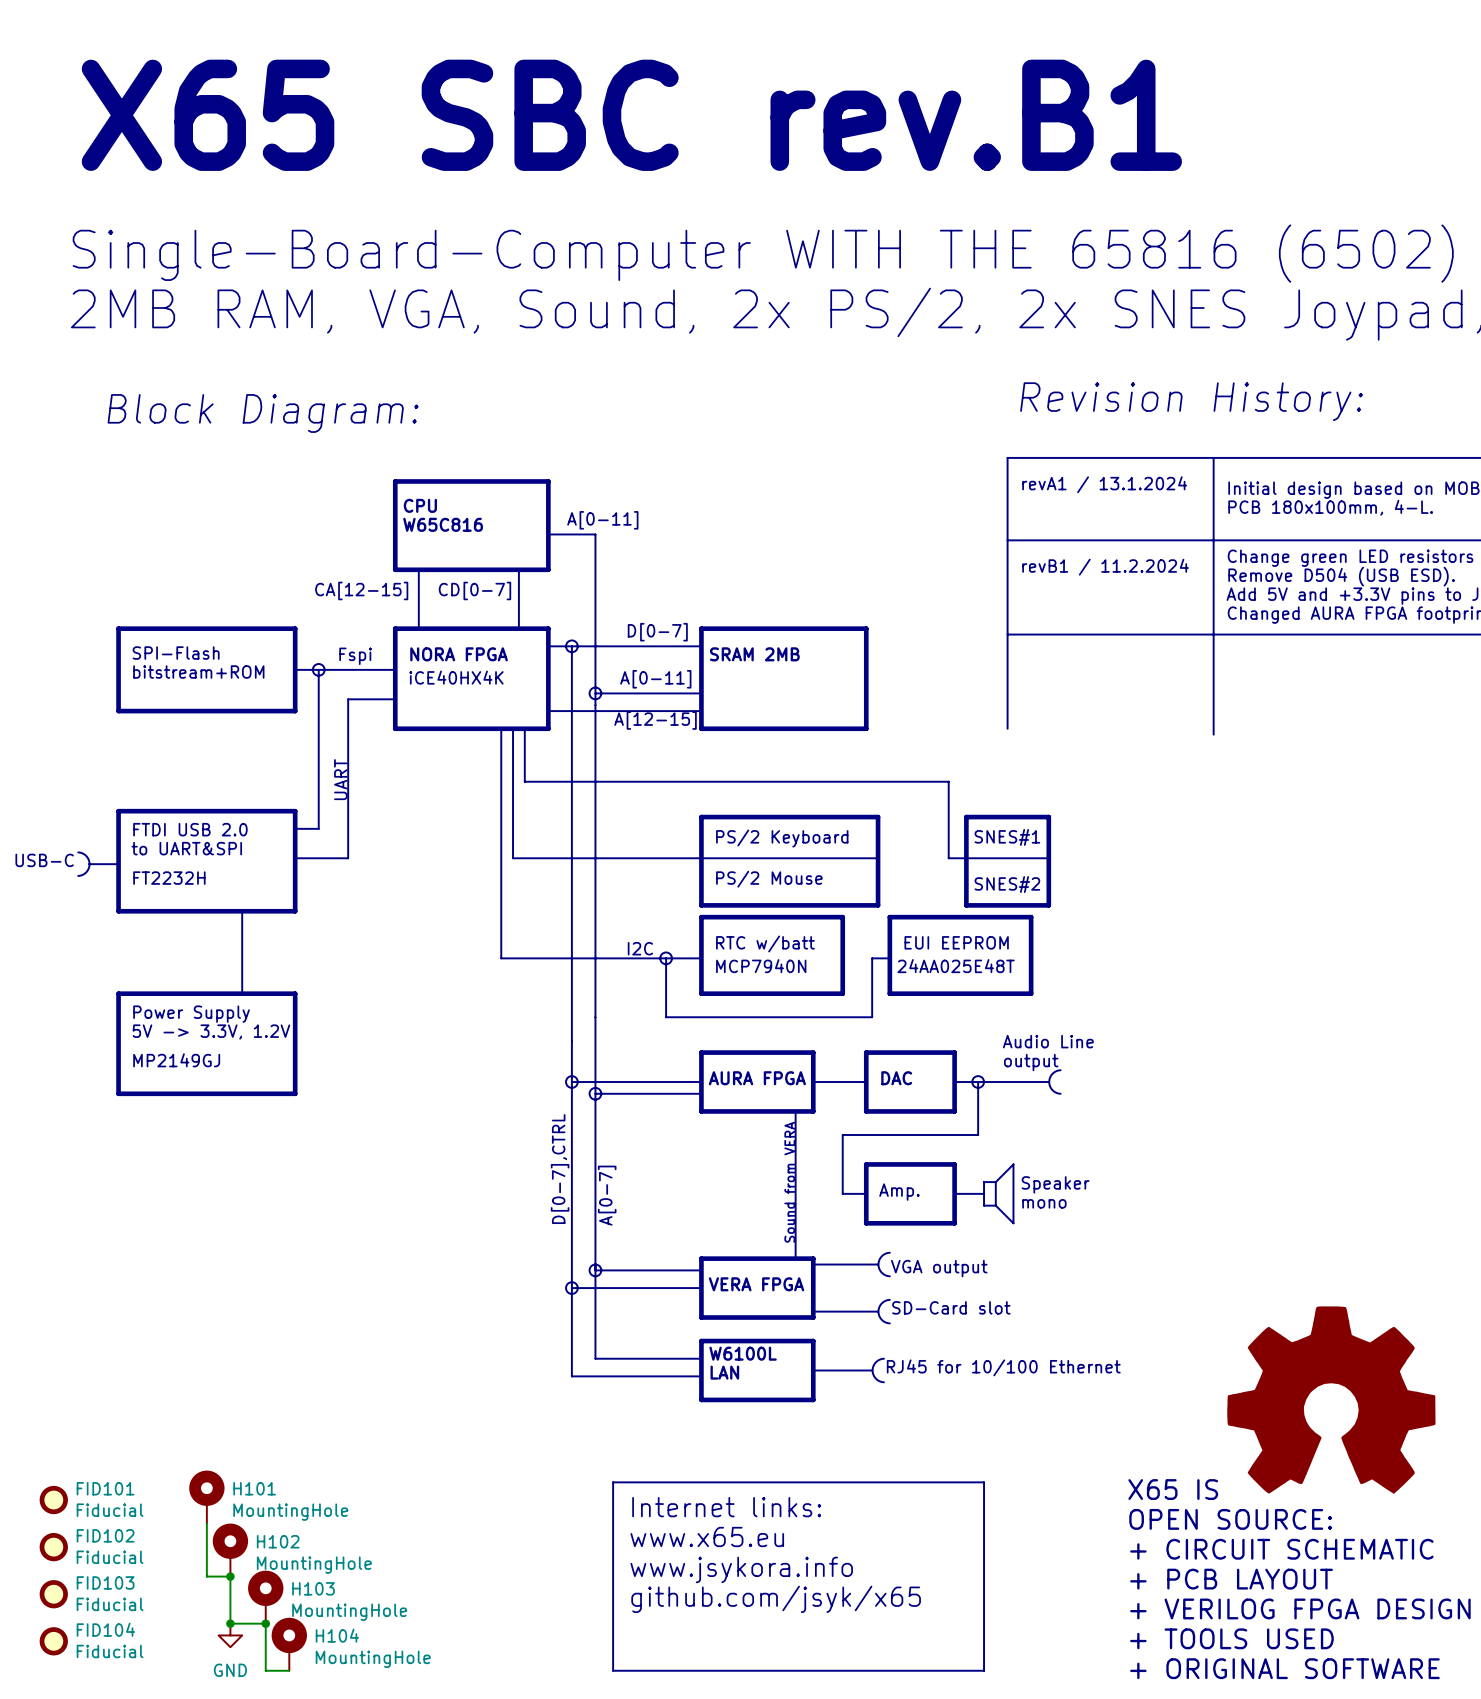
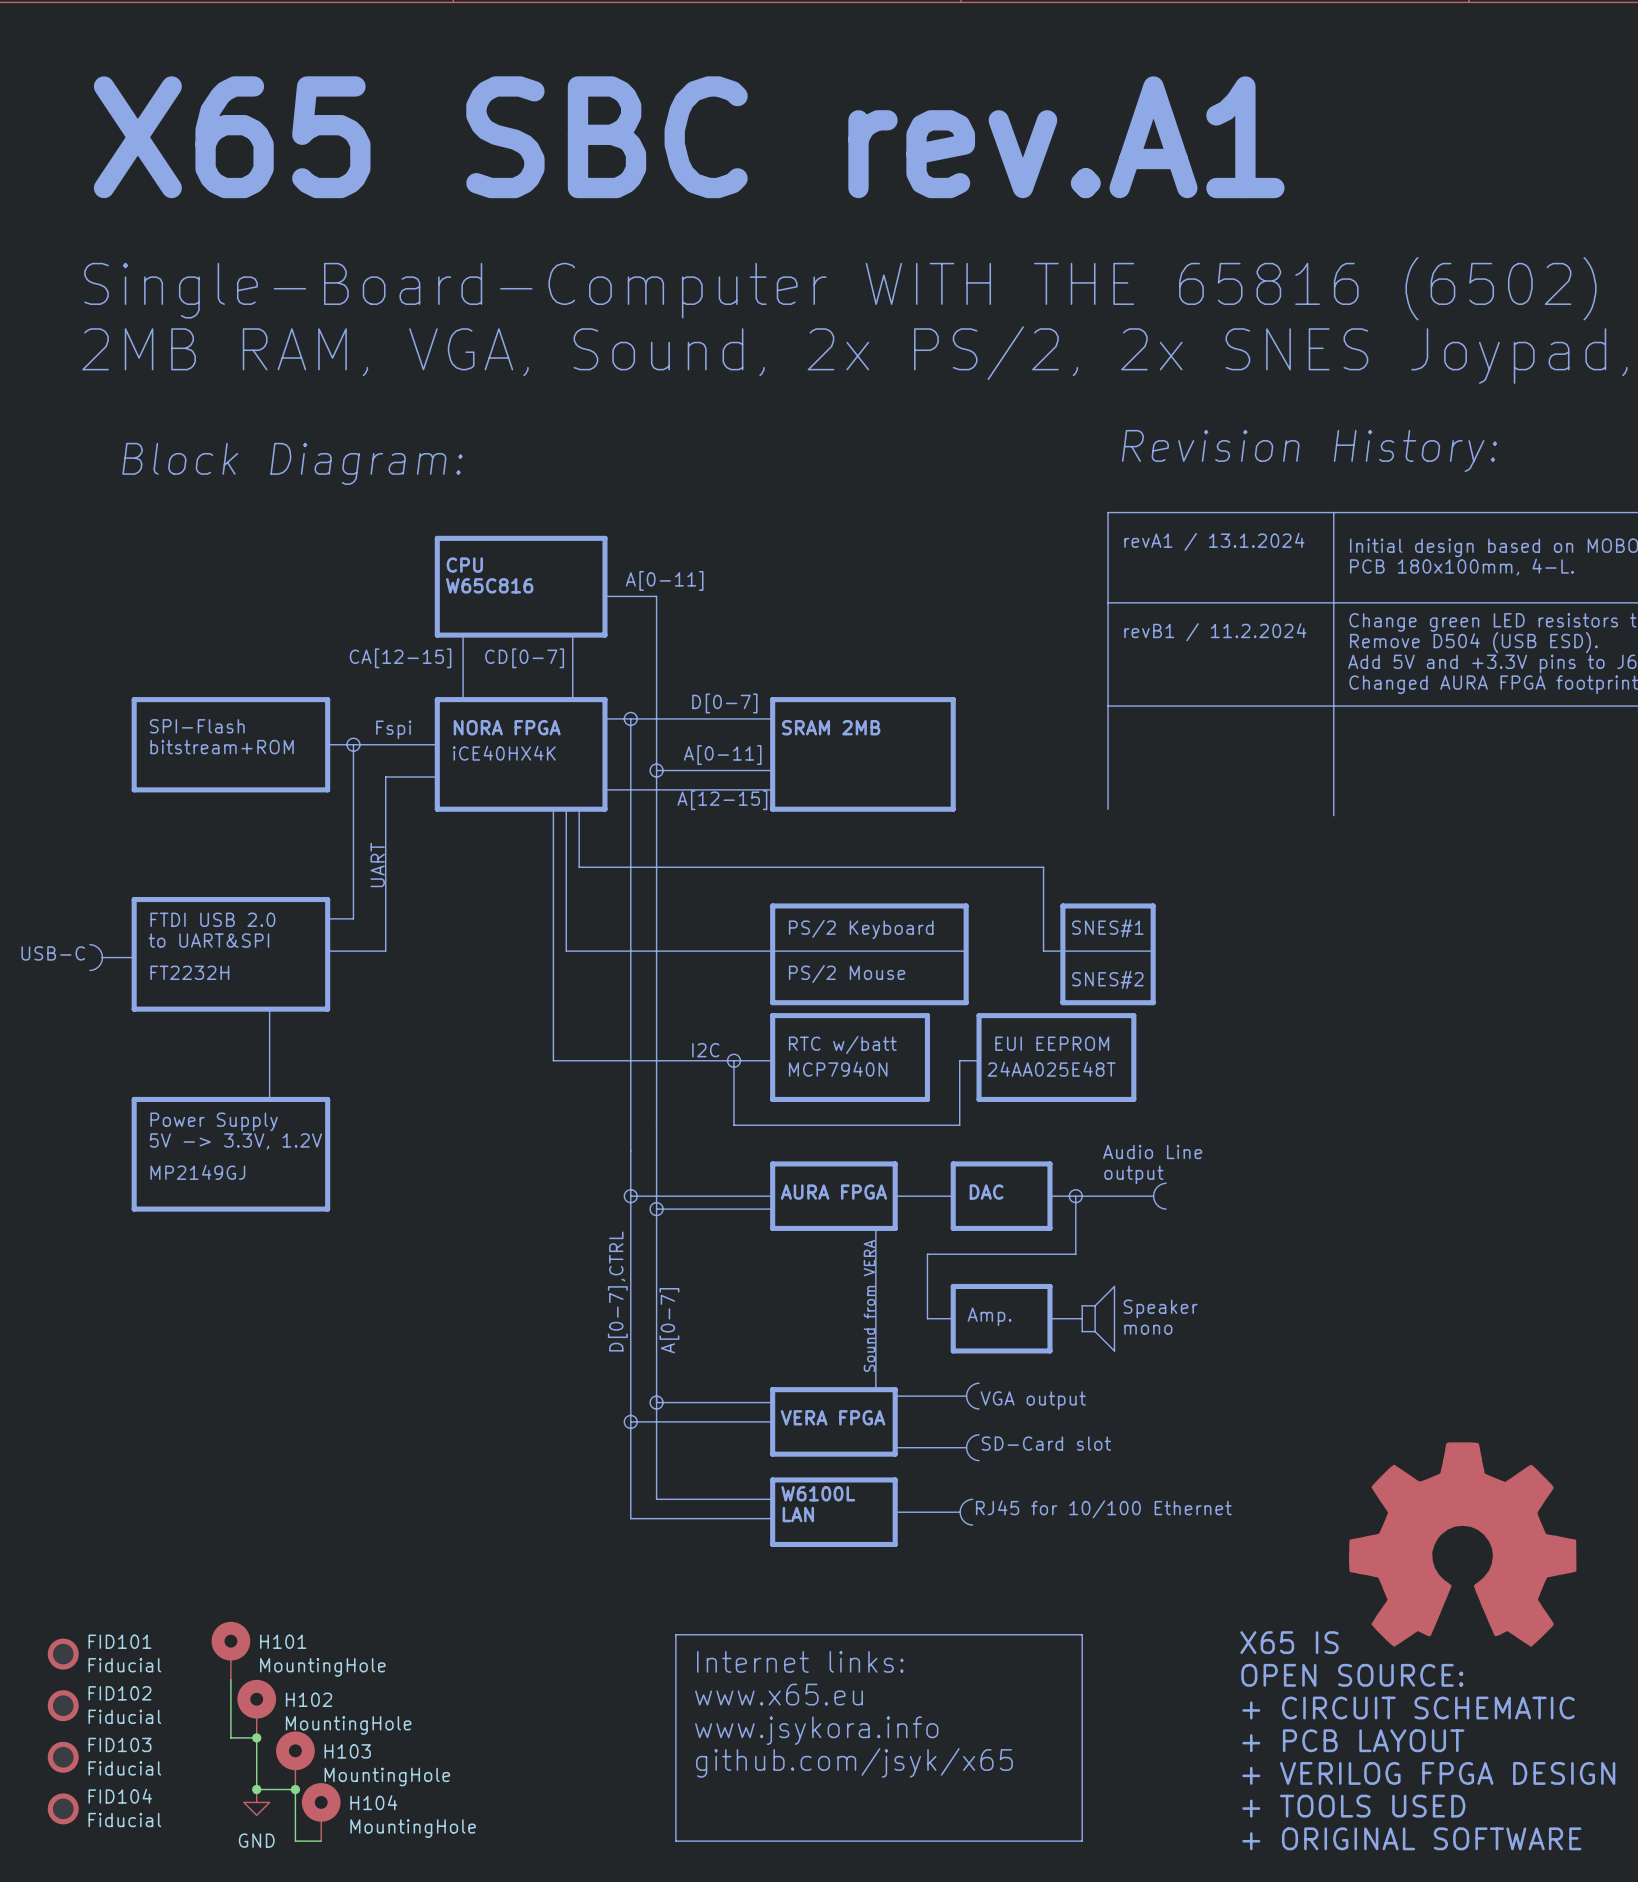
text: X65 SBC rev.B1 (631, 115) -> X65 SBC rev.A1 (689, 137)

